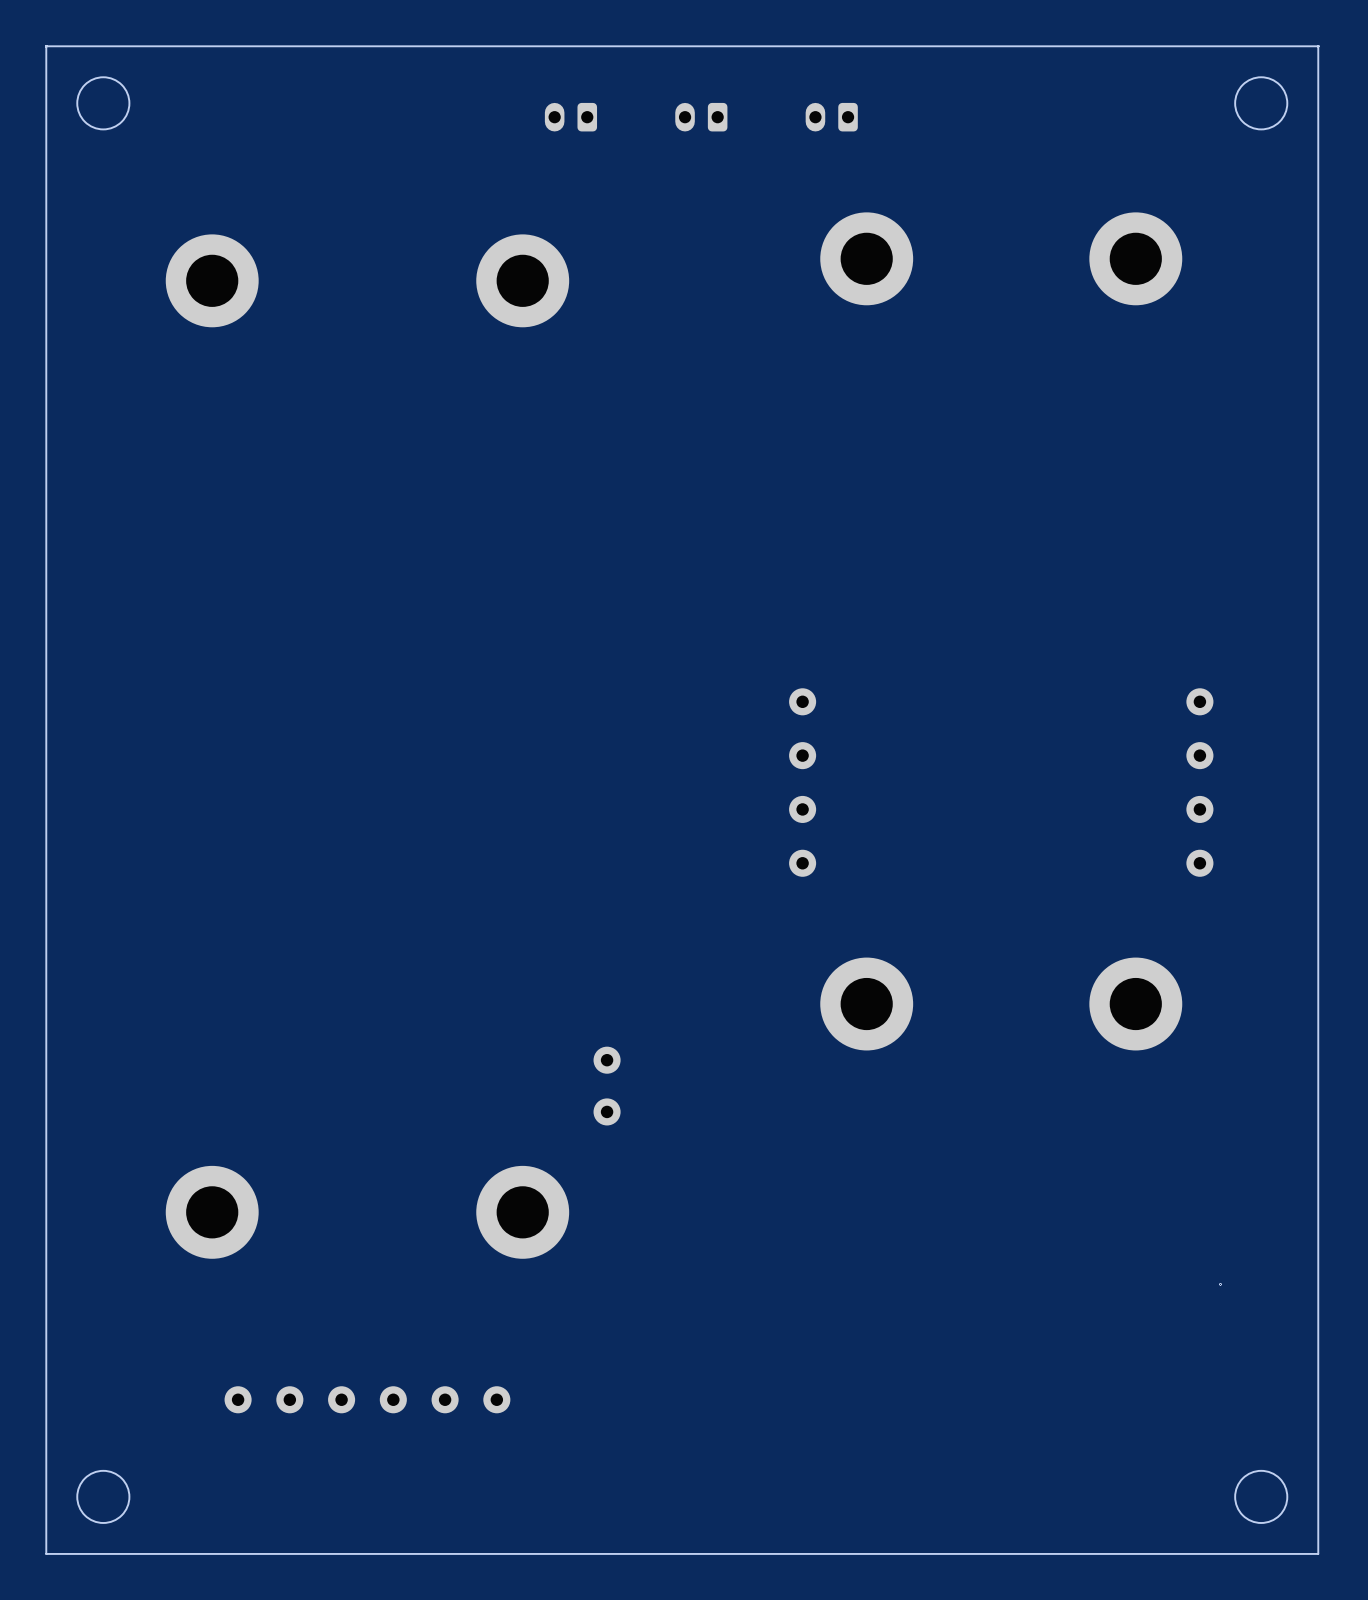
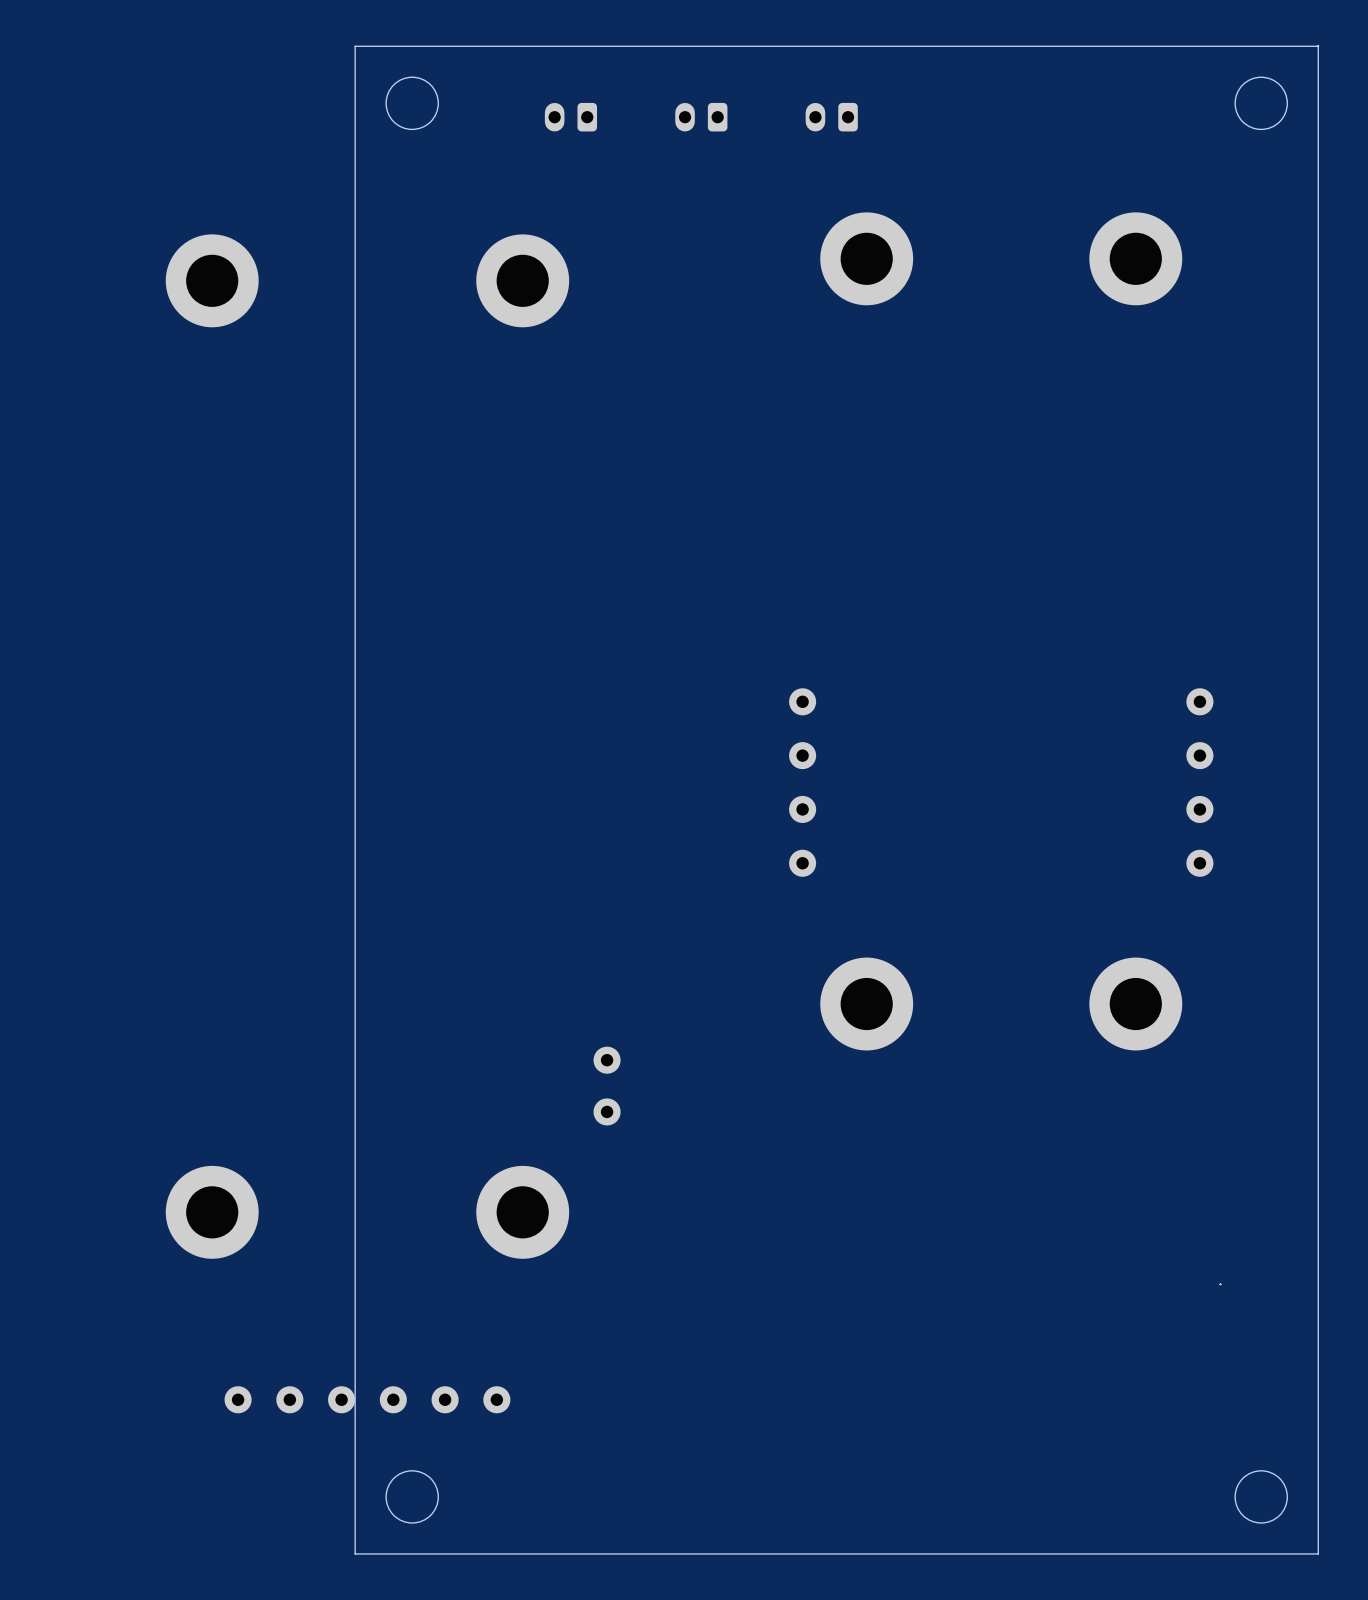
board edge: (355, 46) (46, 46) (46, 1553) (355, 1553) -> (355, 46) (355, 1553)
round board edge position: (103, 103) -> (412, 103)
round board edge position: (103, 1496) -> (412, 1496)

